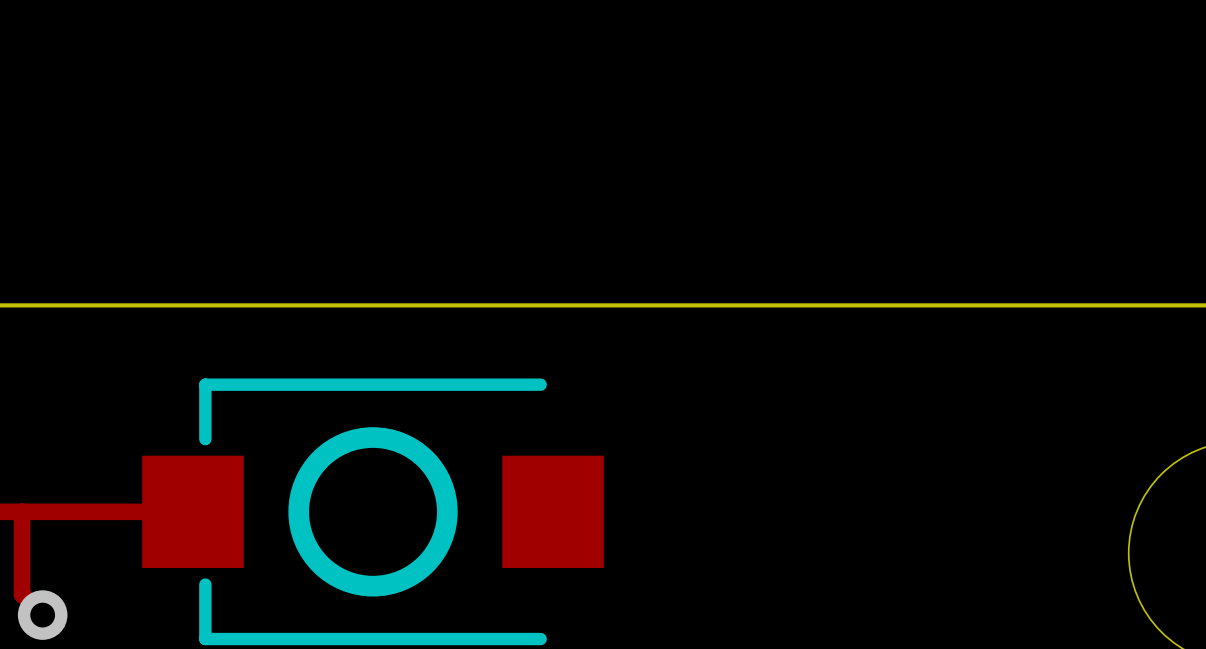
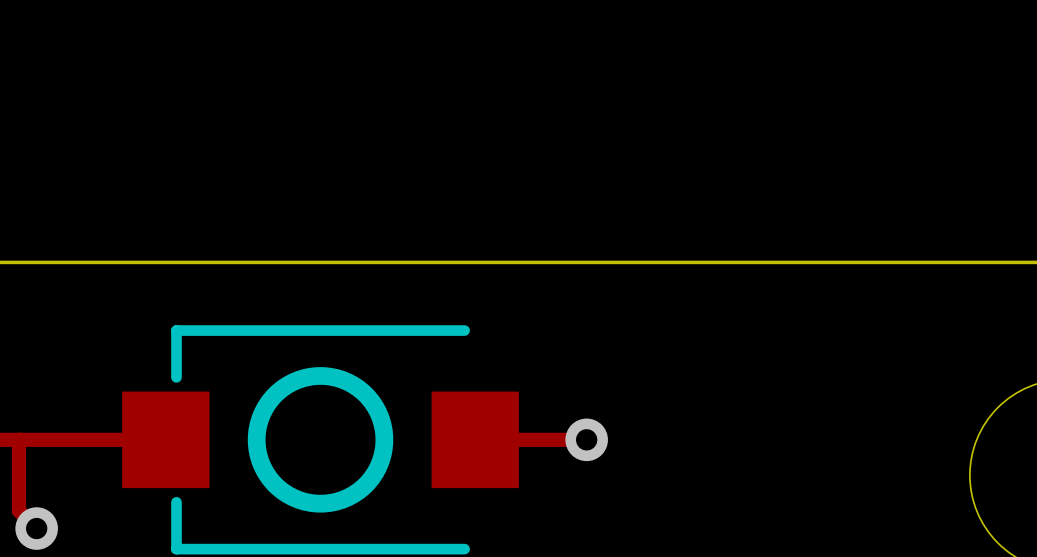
track: none -> (475, 439) (568, 439)
via: none -> (586, 439)

